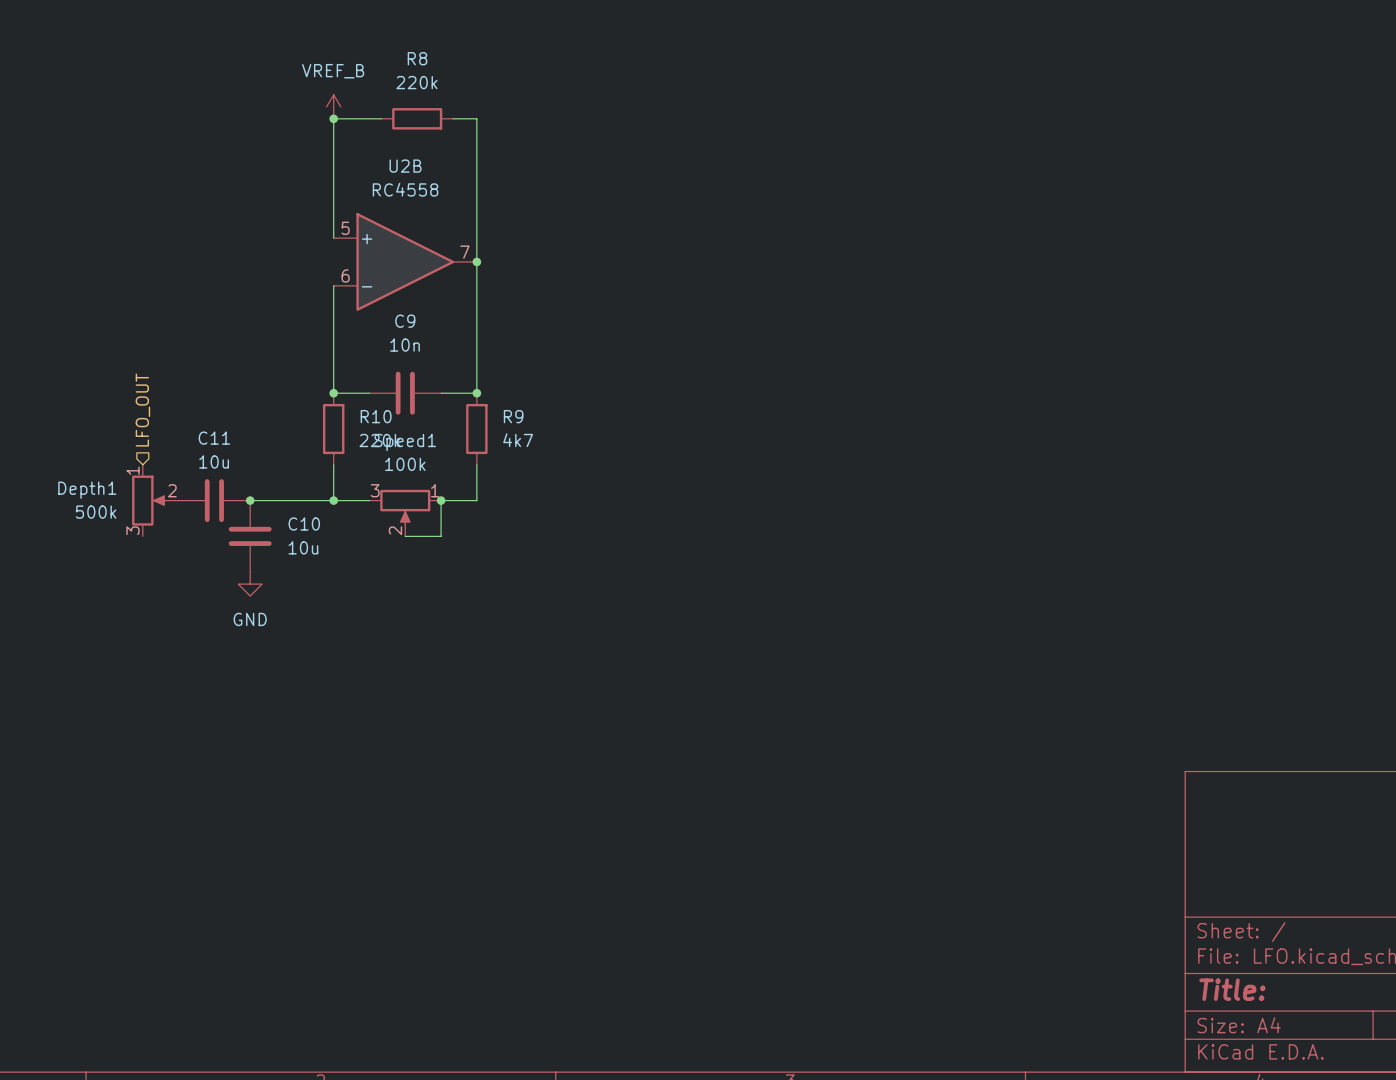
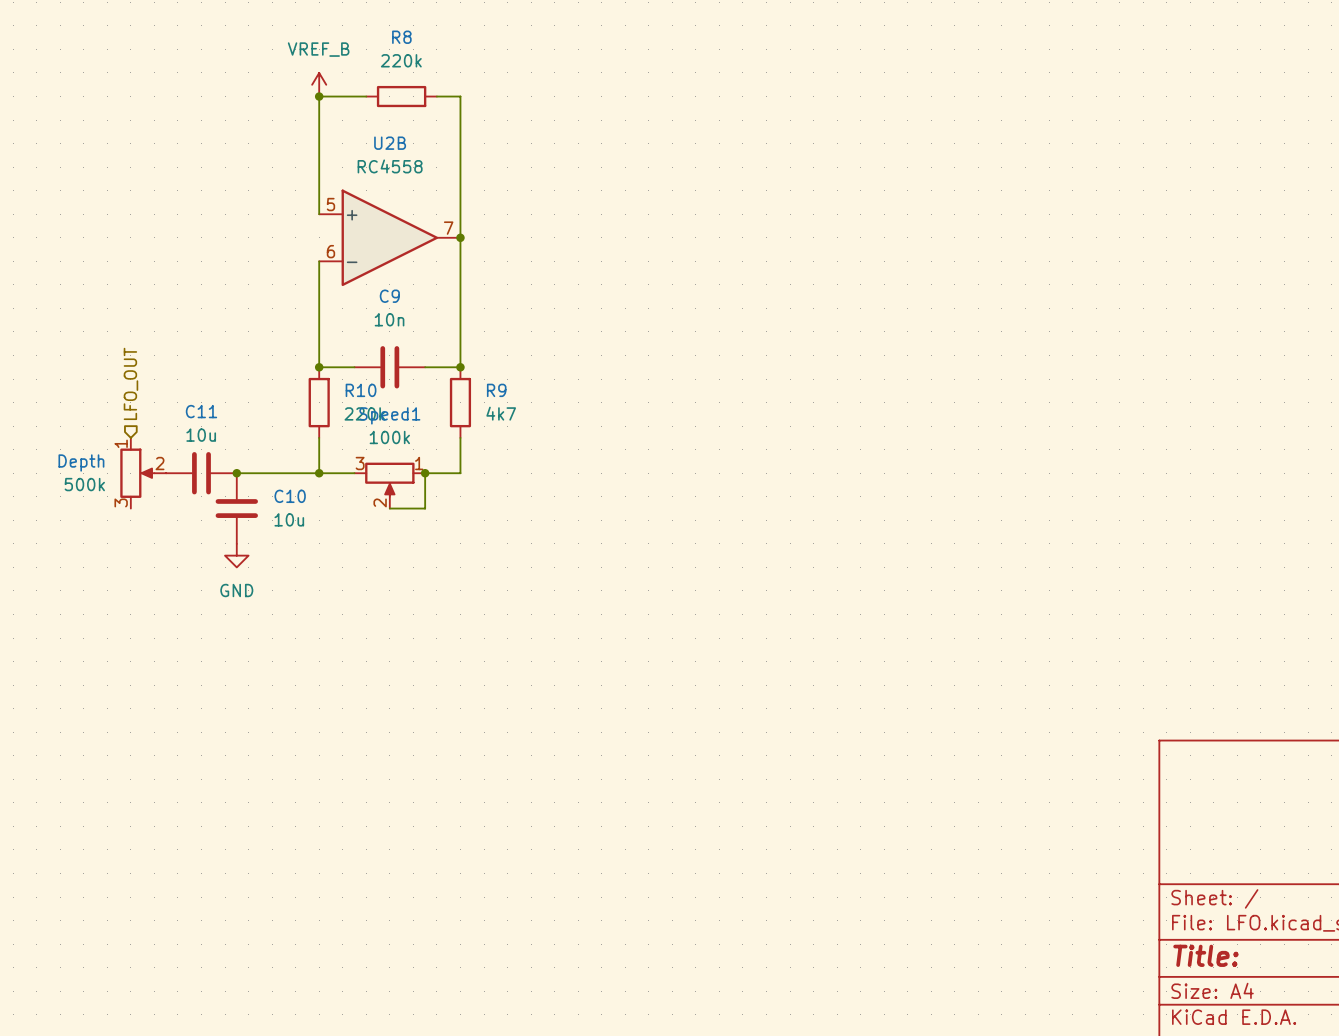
Depth1 name: Depth1 (87, 490) -> Depth (81, 462)

